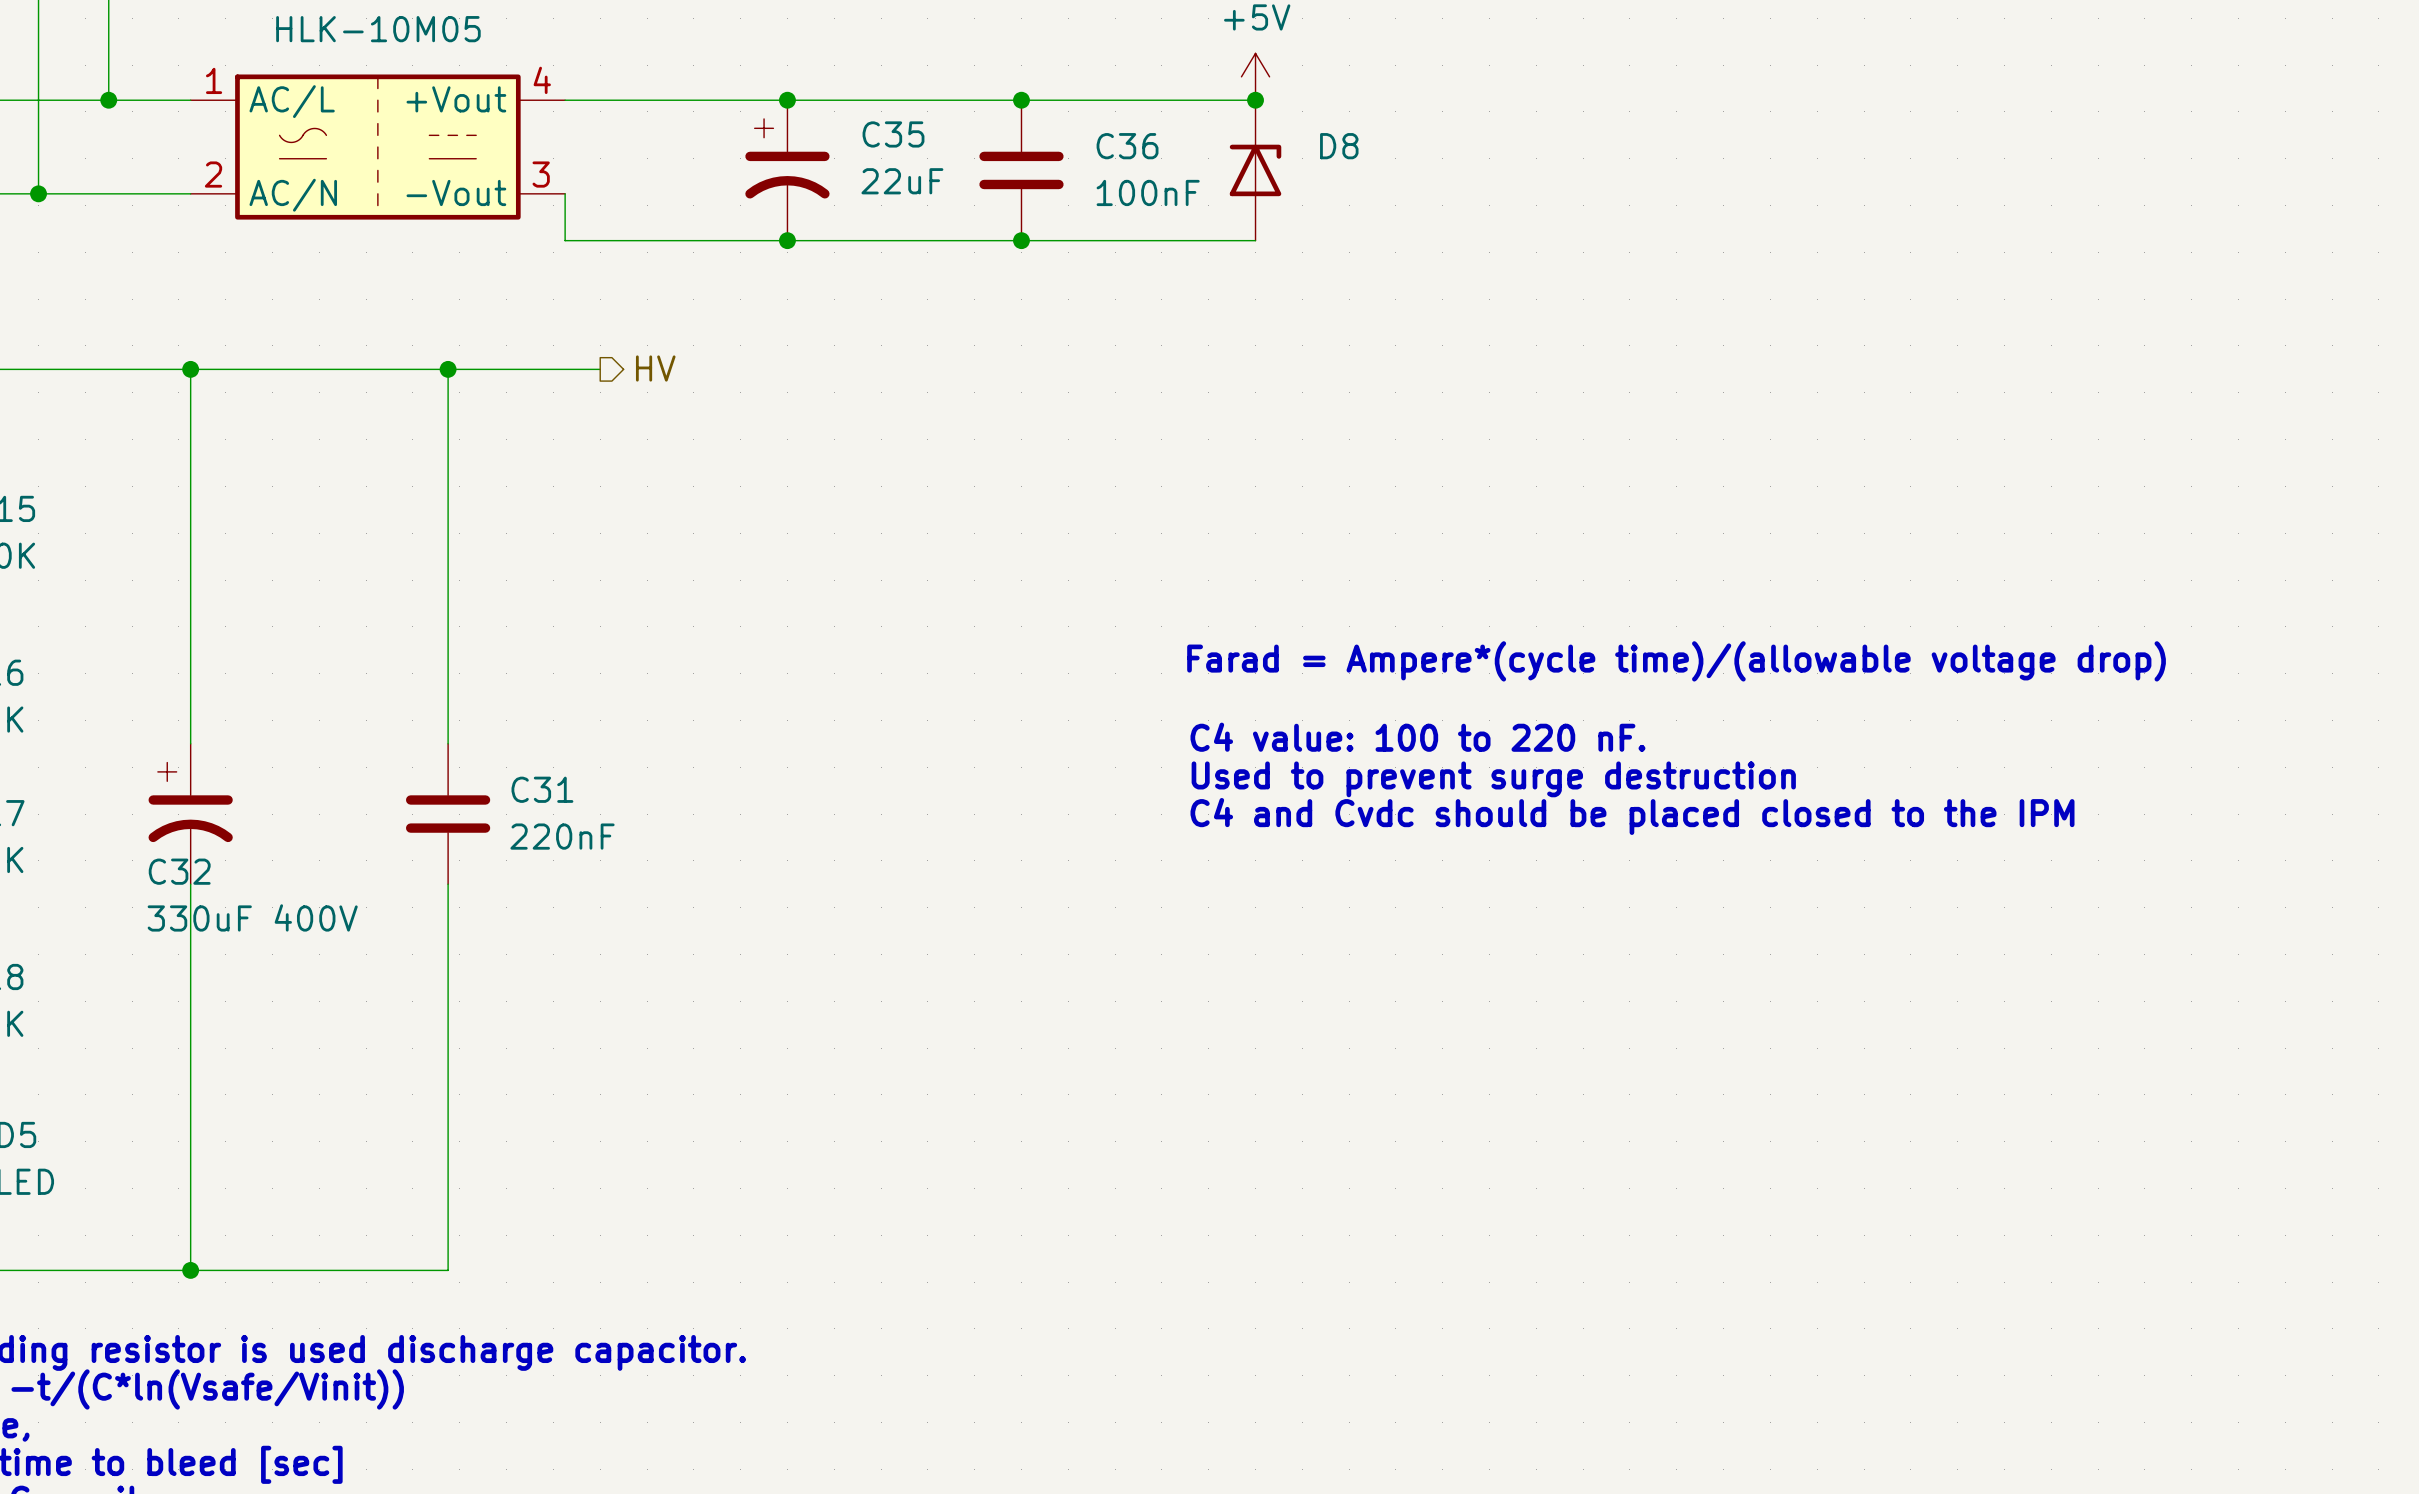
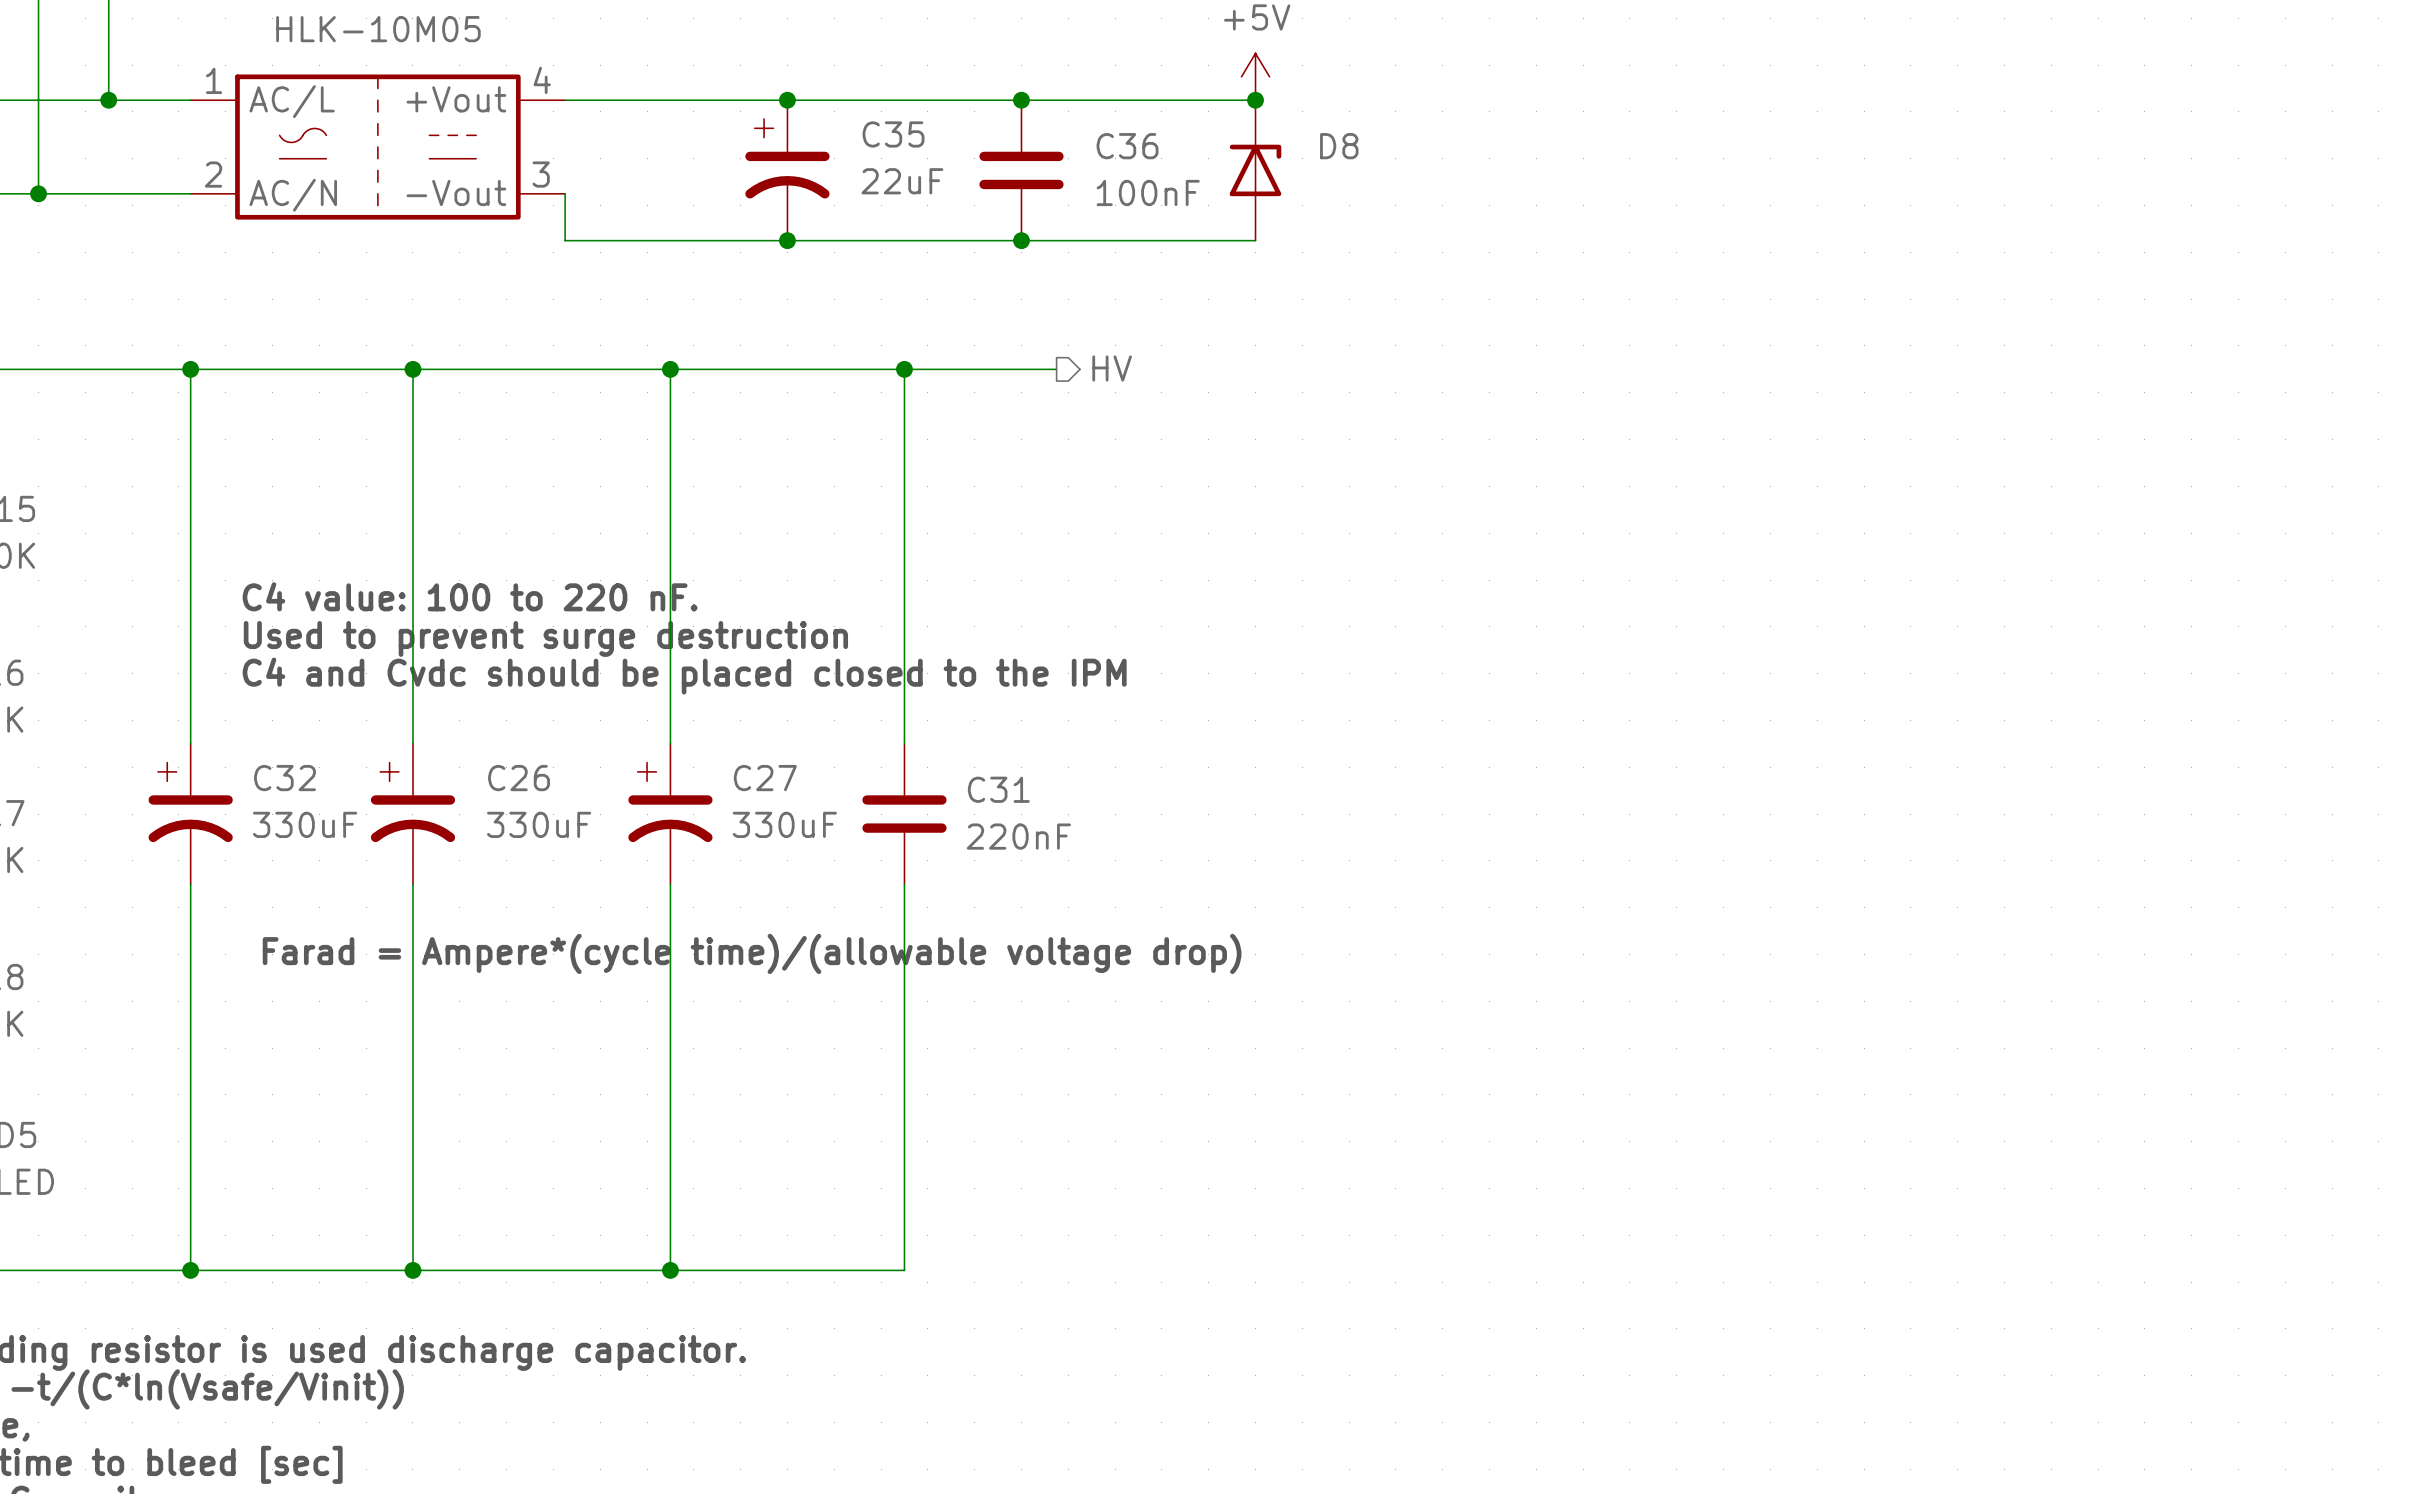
hierarchical label position: HV (655, 368) -> HV (1112, 368)
wire: (448, 369) (448, 743) -> (412, 369) (412, 743)
junction position: (448, 369) -> (412, 369)
wire: none -> (600, 369) (1056, 369)
wire: none -> (670, 369) (670, 743)
junction: none -> (670, 369)
wire: none -> (904, 369) (904, 743)
junction: none -> (904, 369)
text: none -> C4 value: 100 to 220 nF. (470, 596)
text: none -> Used to prevent surge destruction (545, 638)
text: Farad = Ampere*(cycle time)/(allowable voltage drop) (1676, 661) -> none
text: none -> C4 and Cvdc should be placed closed to the IPM (684, 676)
text: C4 value: 100 to 220 nF. (1417, 737) -> none
text: Used to prevent surge destruction (1493, 779) -> none
C26: none -> 330uF (412, 814)
C31 position: (448, 814) -> (904, 814)
C27: none -> 330uF (670, 814)
text: C4 and Cvdc should be placed closed to the IPM (1632, 816) -> none
C32 name position: C32 (179, 871) -> C32 (285, 778)
wire: none -> (412, 884) (412, 1270)
wire: (448, 884) (448, 1270) -> (904, 884) (904, 1270) (448, 1270)
wire: none -> (670, 884) (670, 1270)
C32 value: 330uF 400V (252, 917) -> 330uF (305, 824)
text: none -> Farad = Ampere*(cycle time)/(allowable voltage drop) (752, 953)
junction: none -> (412, 1270)
junction: none -> (670, 1270)

